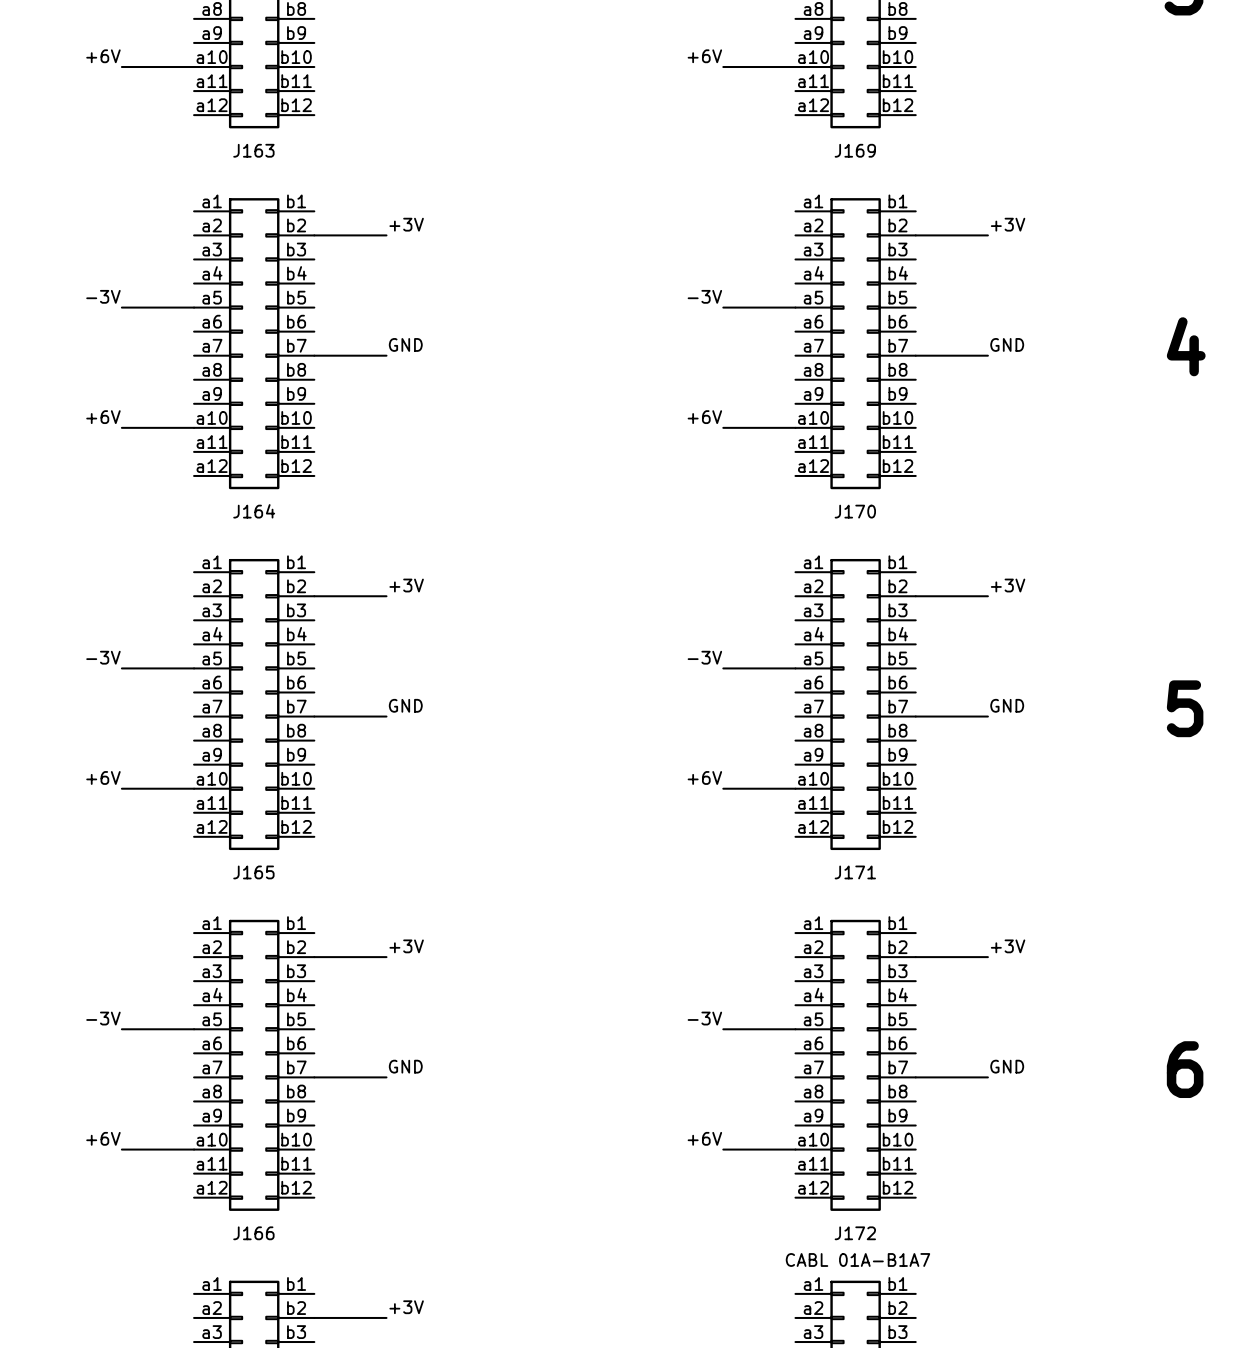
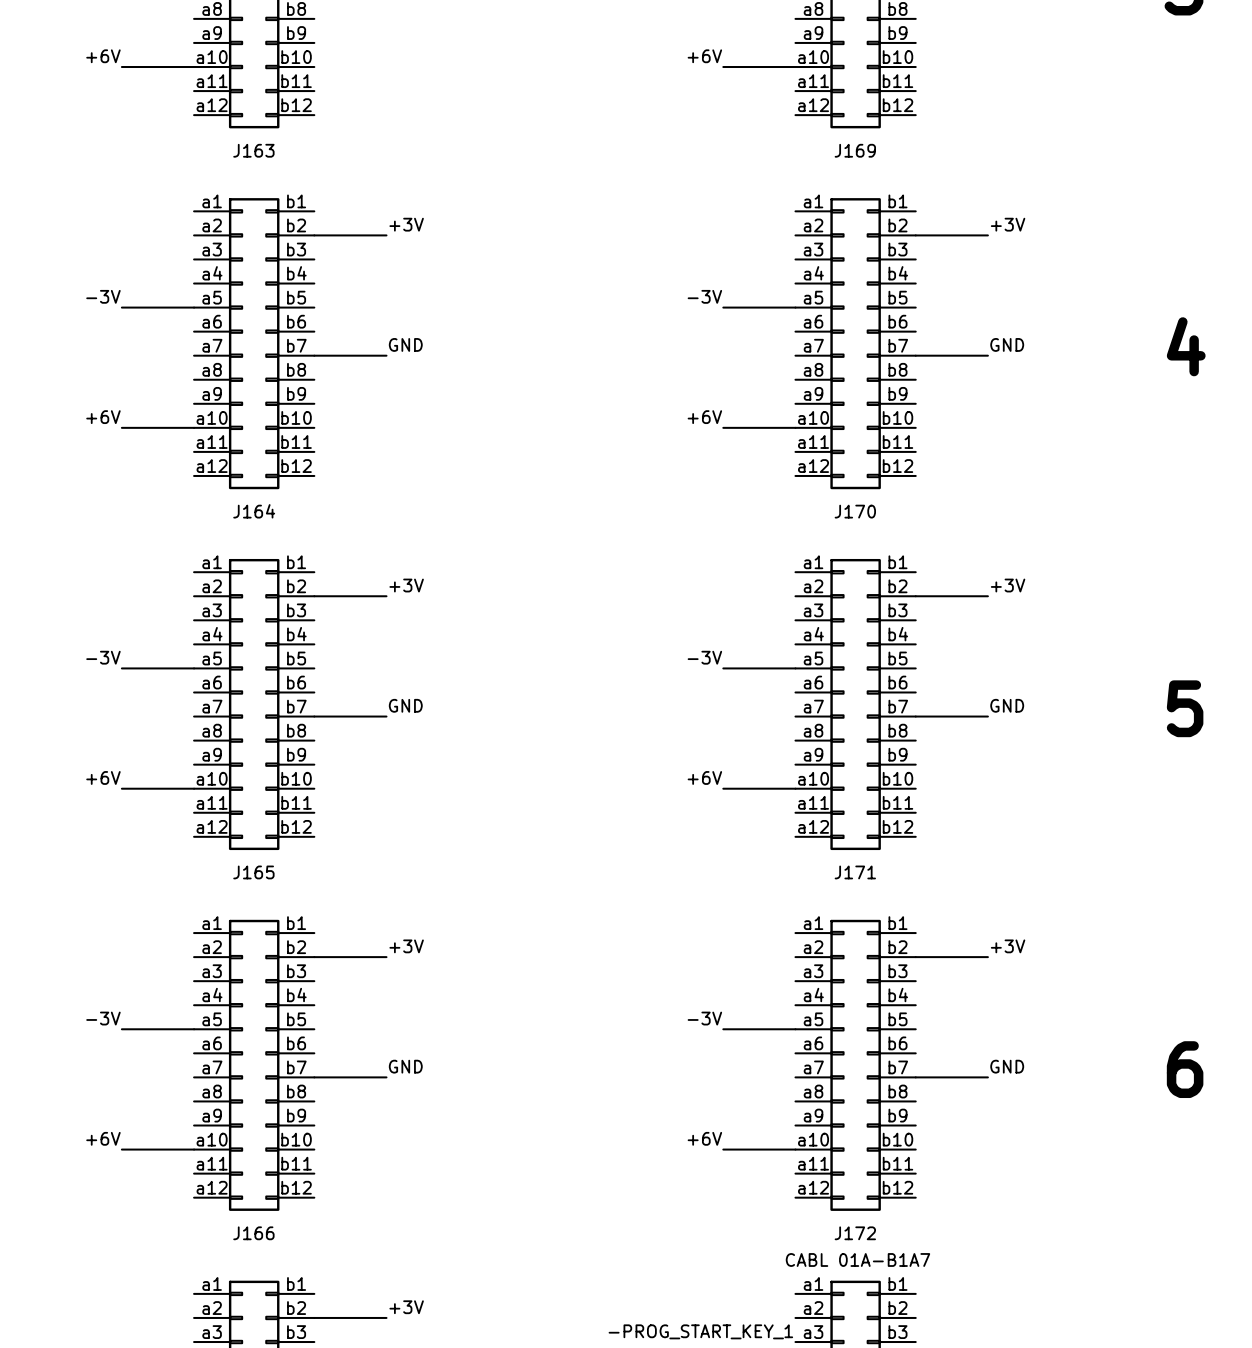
label: none -> -PROG_START_KEY_1 (700, 1331)

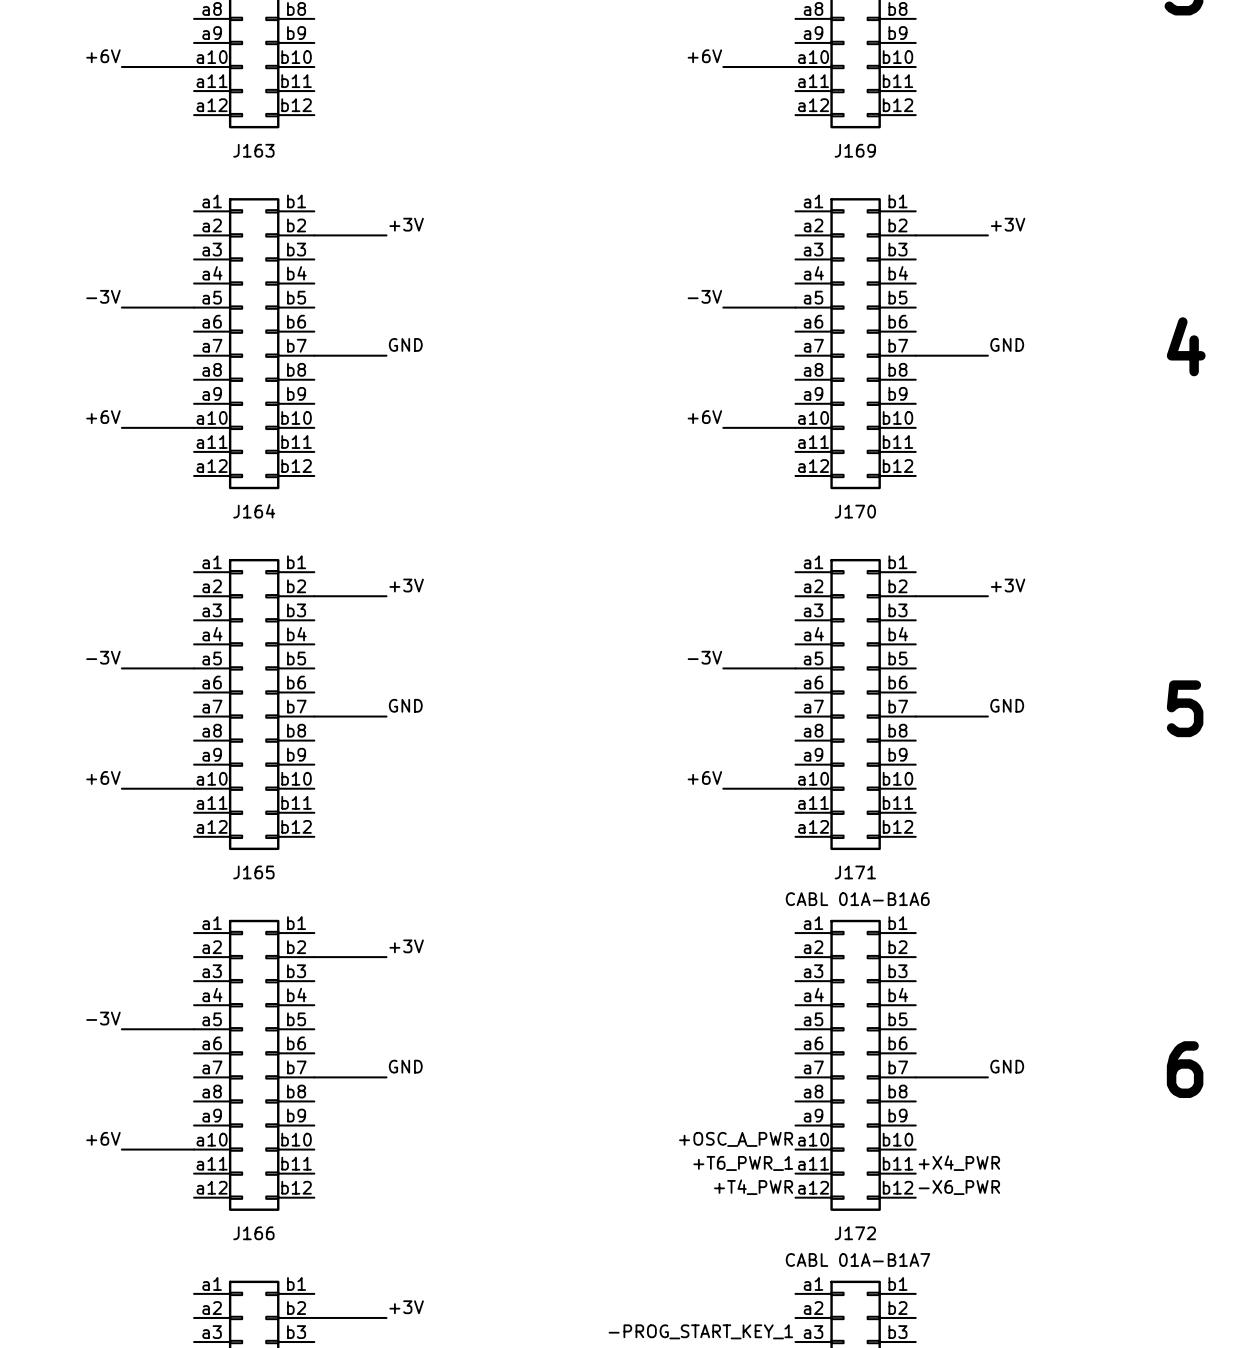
text: none -> CABL 01A-B1A6 (857, 899)
label: +3V (1008, 946) -> none
wire: (915, 957) (987, 957) -> none
label: -3V (704, 1018) -> none
wire: (723, 1029) (795, 1029) -> none
label: +6V (704, 1138) -> none
label: none -> +OSC_A_PWR (736, 1139)
wire: (723, 1149) (795, 1149) -> none
label: none -> +T6_PWR_1 (743, 1163)
label: none -> +X4_PWR (959, 1163)
label: none -> +T4_PWR (753, 1187)
label: none -> -X6_PWR (959, 1187)

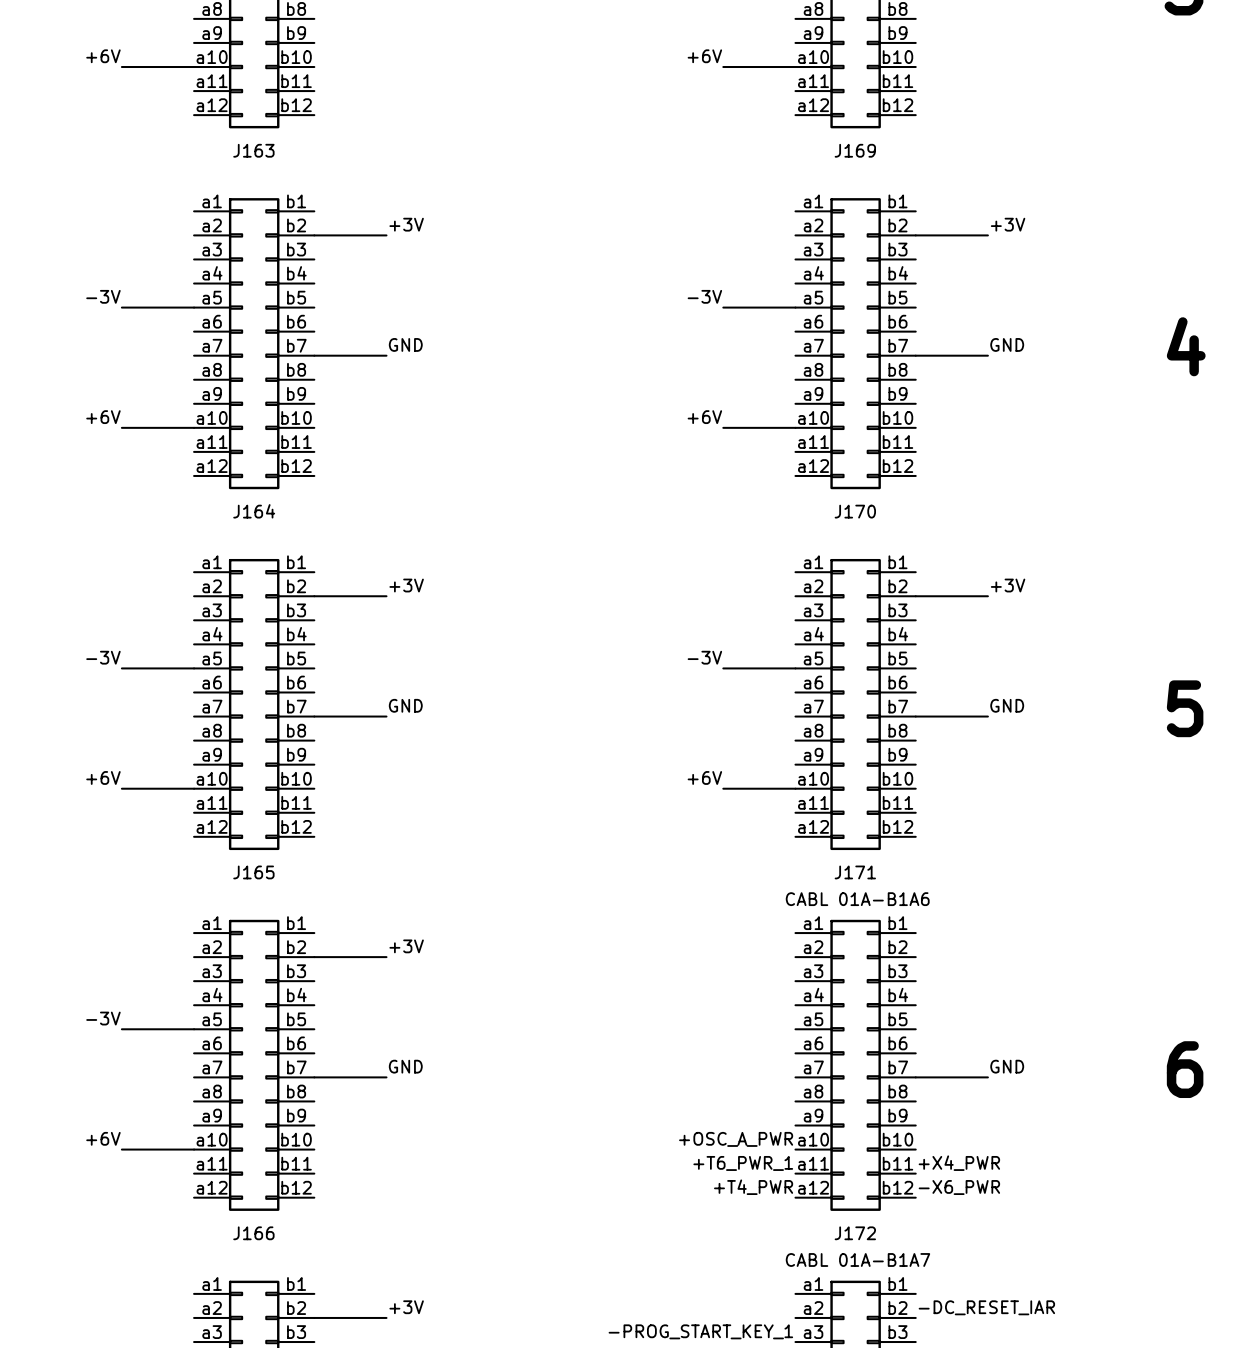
label: none -> -DC_RESET_IAR (986, 1307)

